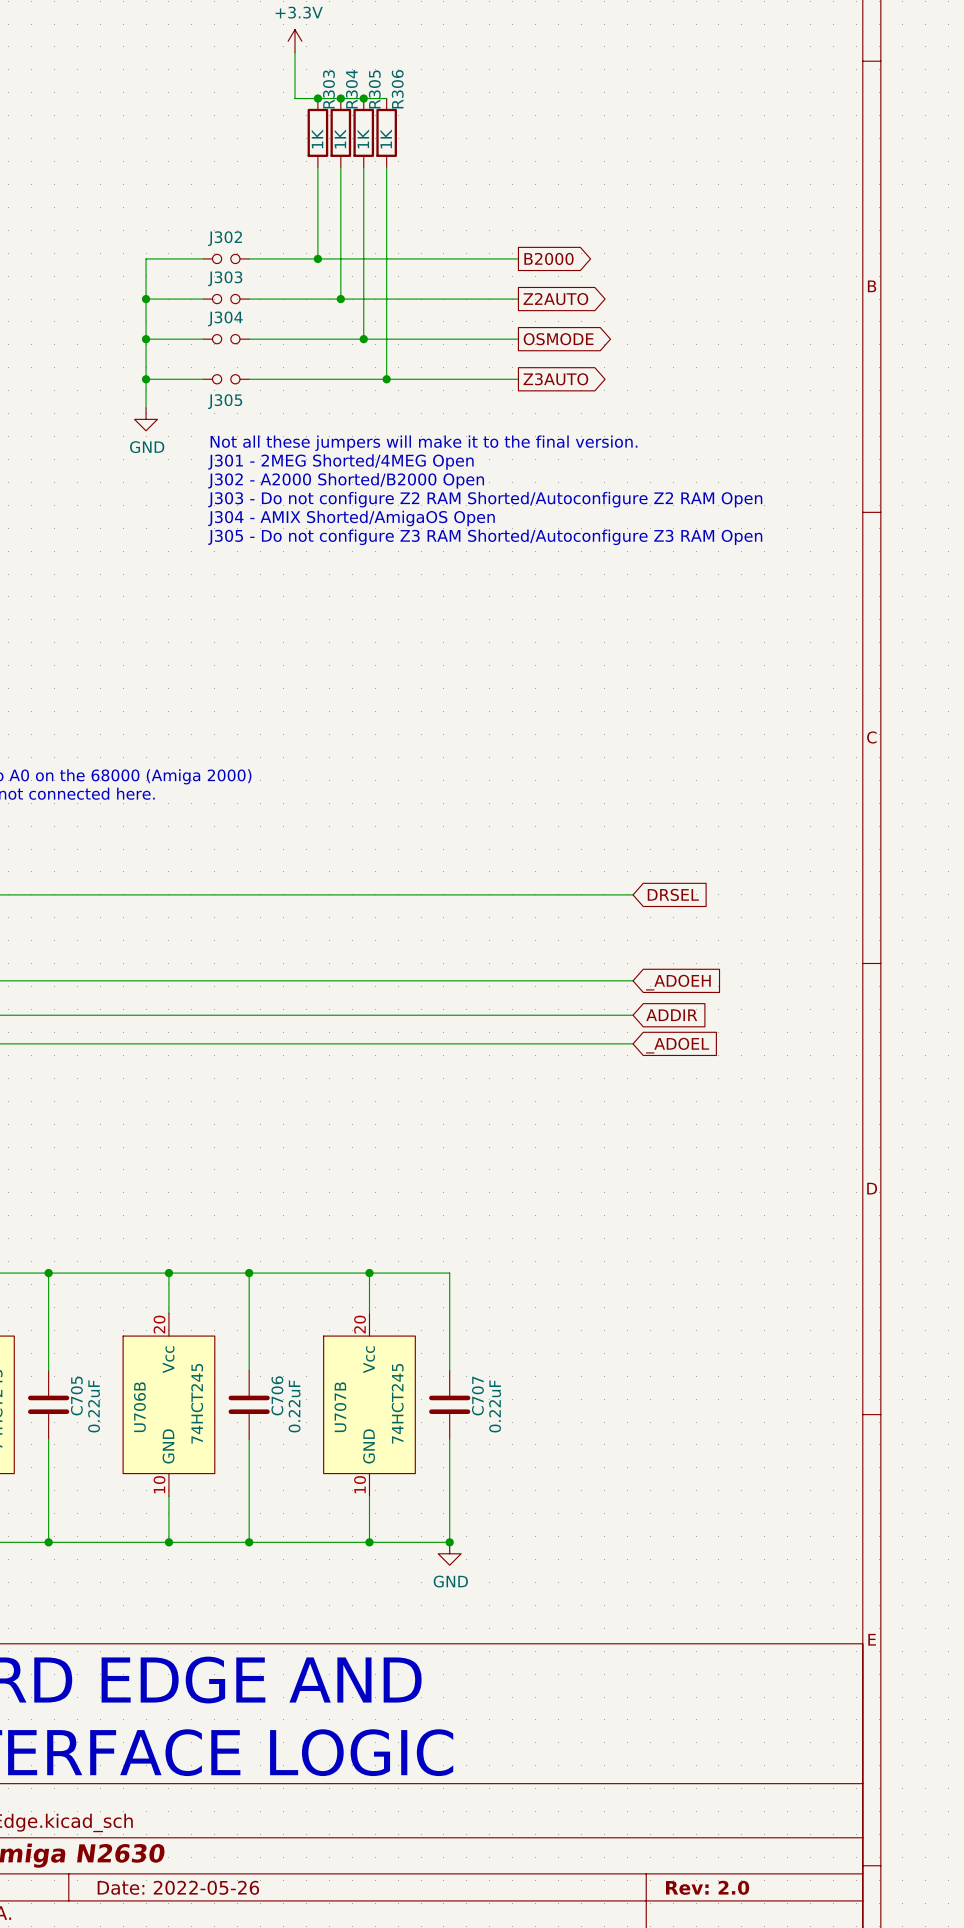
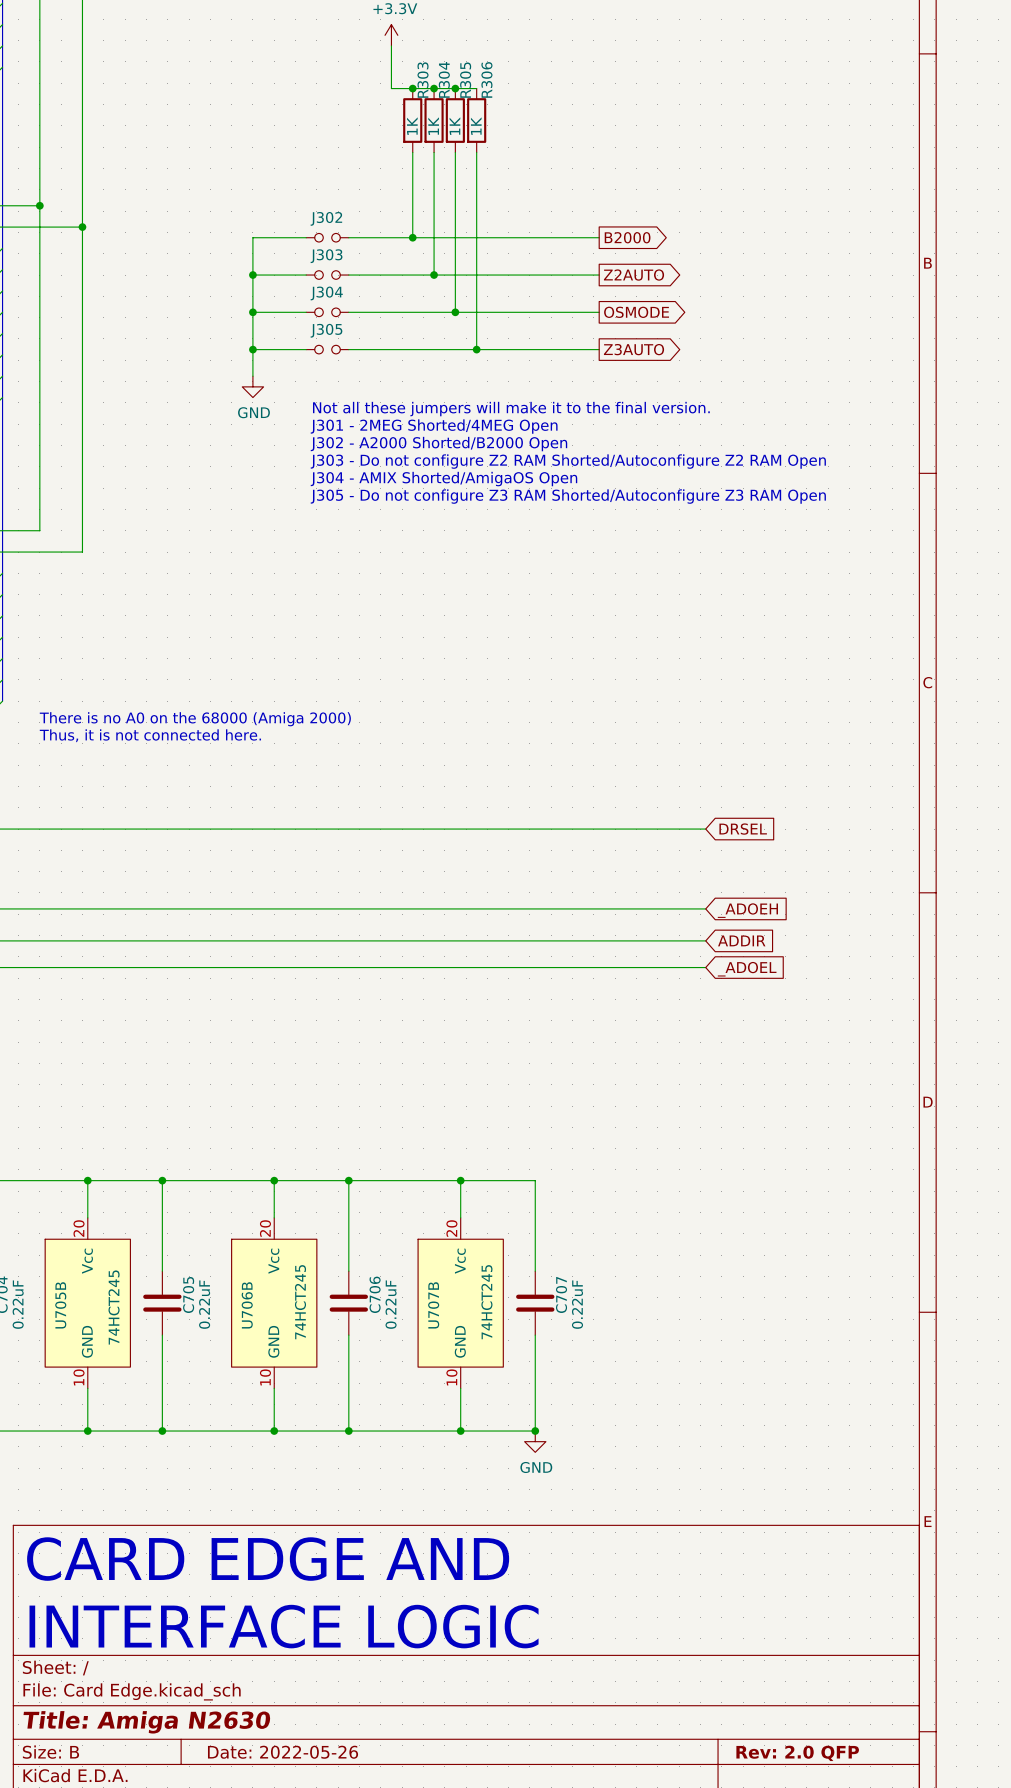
J305 name position: J305 (225, 401) -> J305 (326, 330)
title block: Rev: 2.0 (707, 1887) -> Rev: 2.0 QFP (797, 1753)

